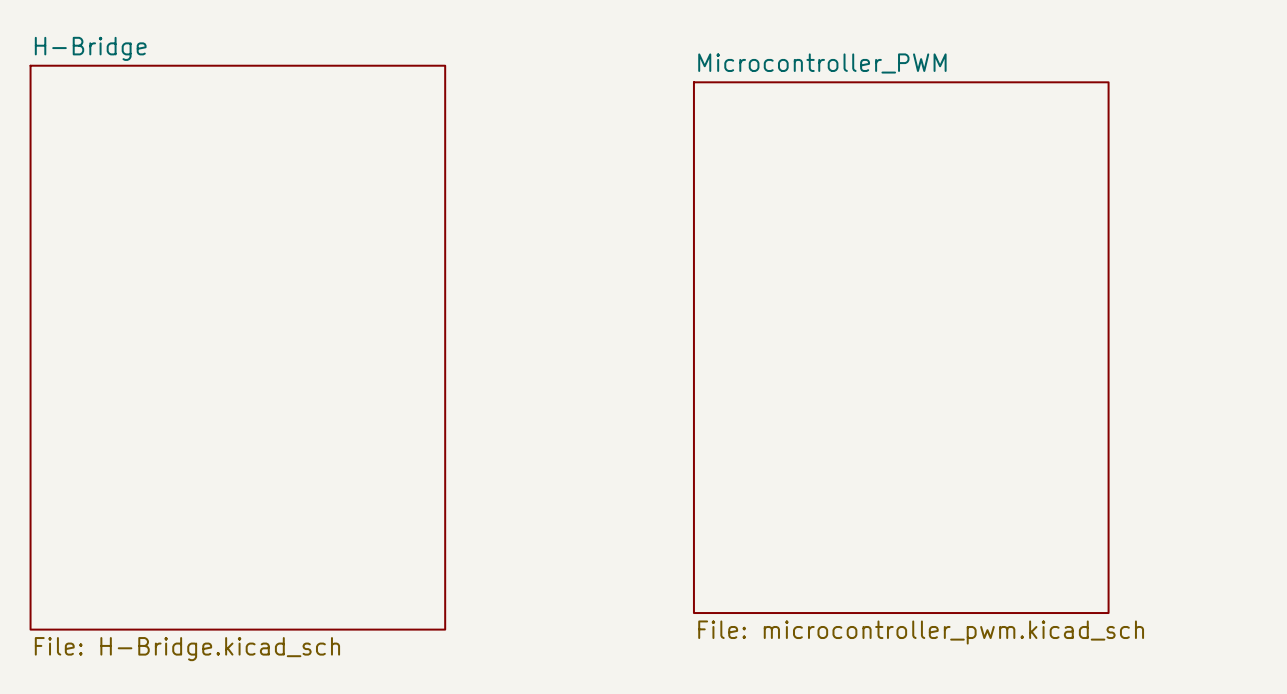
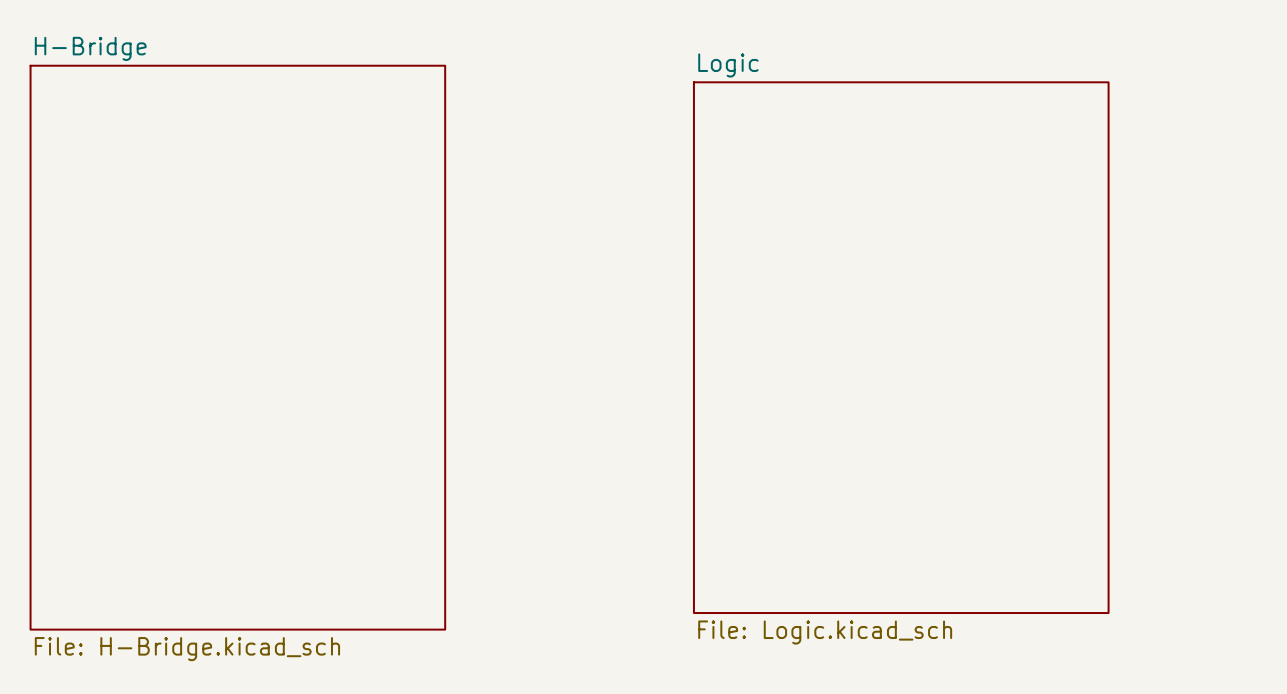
sheet Microcontroller_PWM name: Microcontroller_PWM (822, 63) -> Logic (728, 65)
sheet Microcontroller_PWM value: File: microcontroller_pwm.kicad_sch (921, 632) -> File: Logic.kicad_sch (825, 632)

